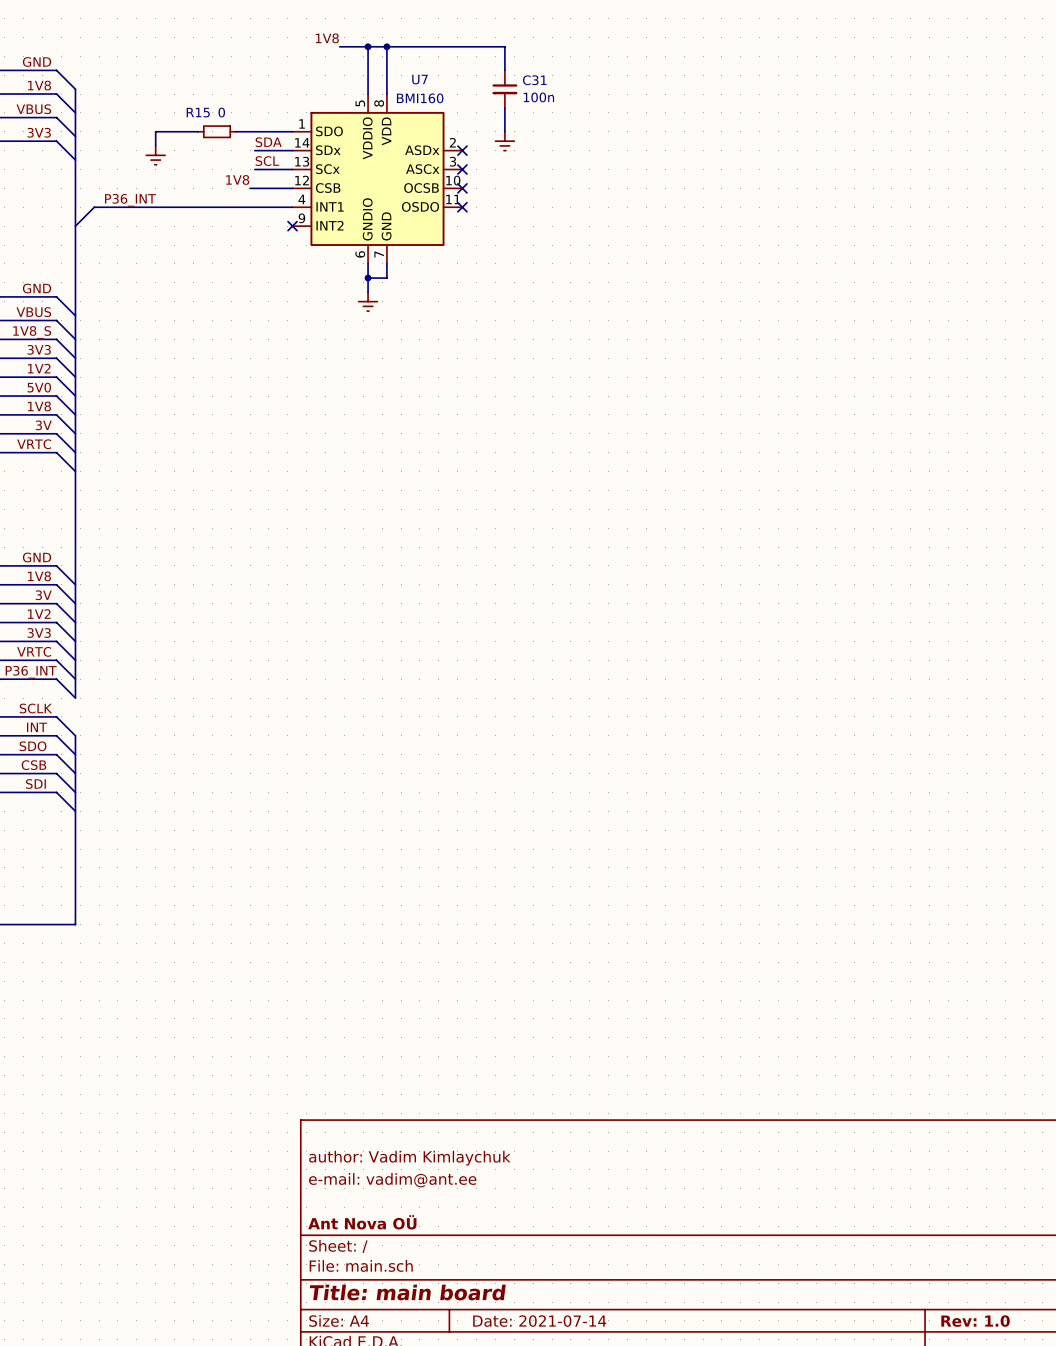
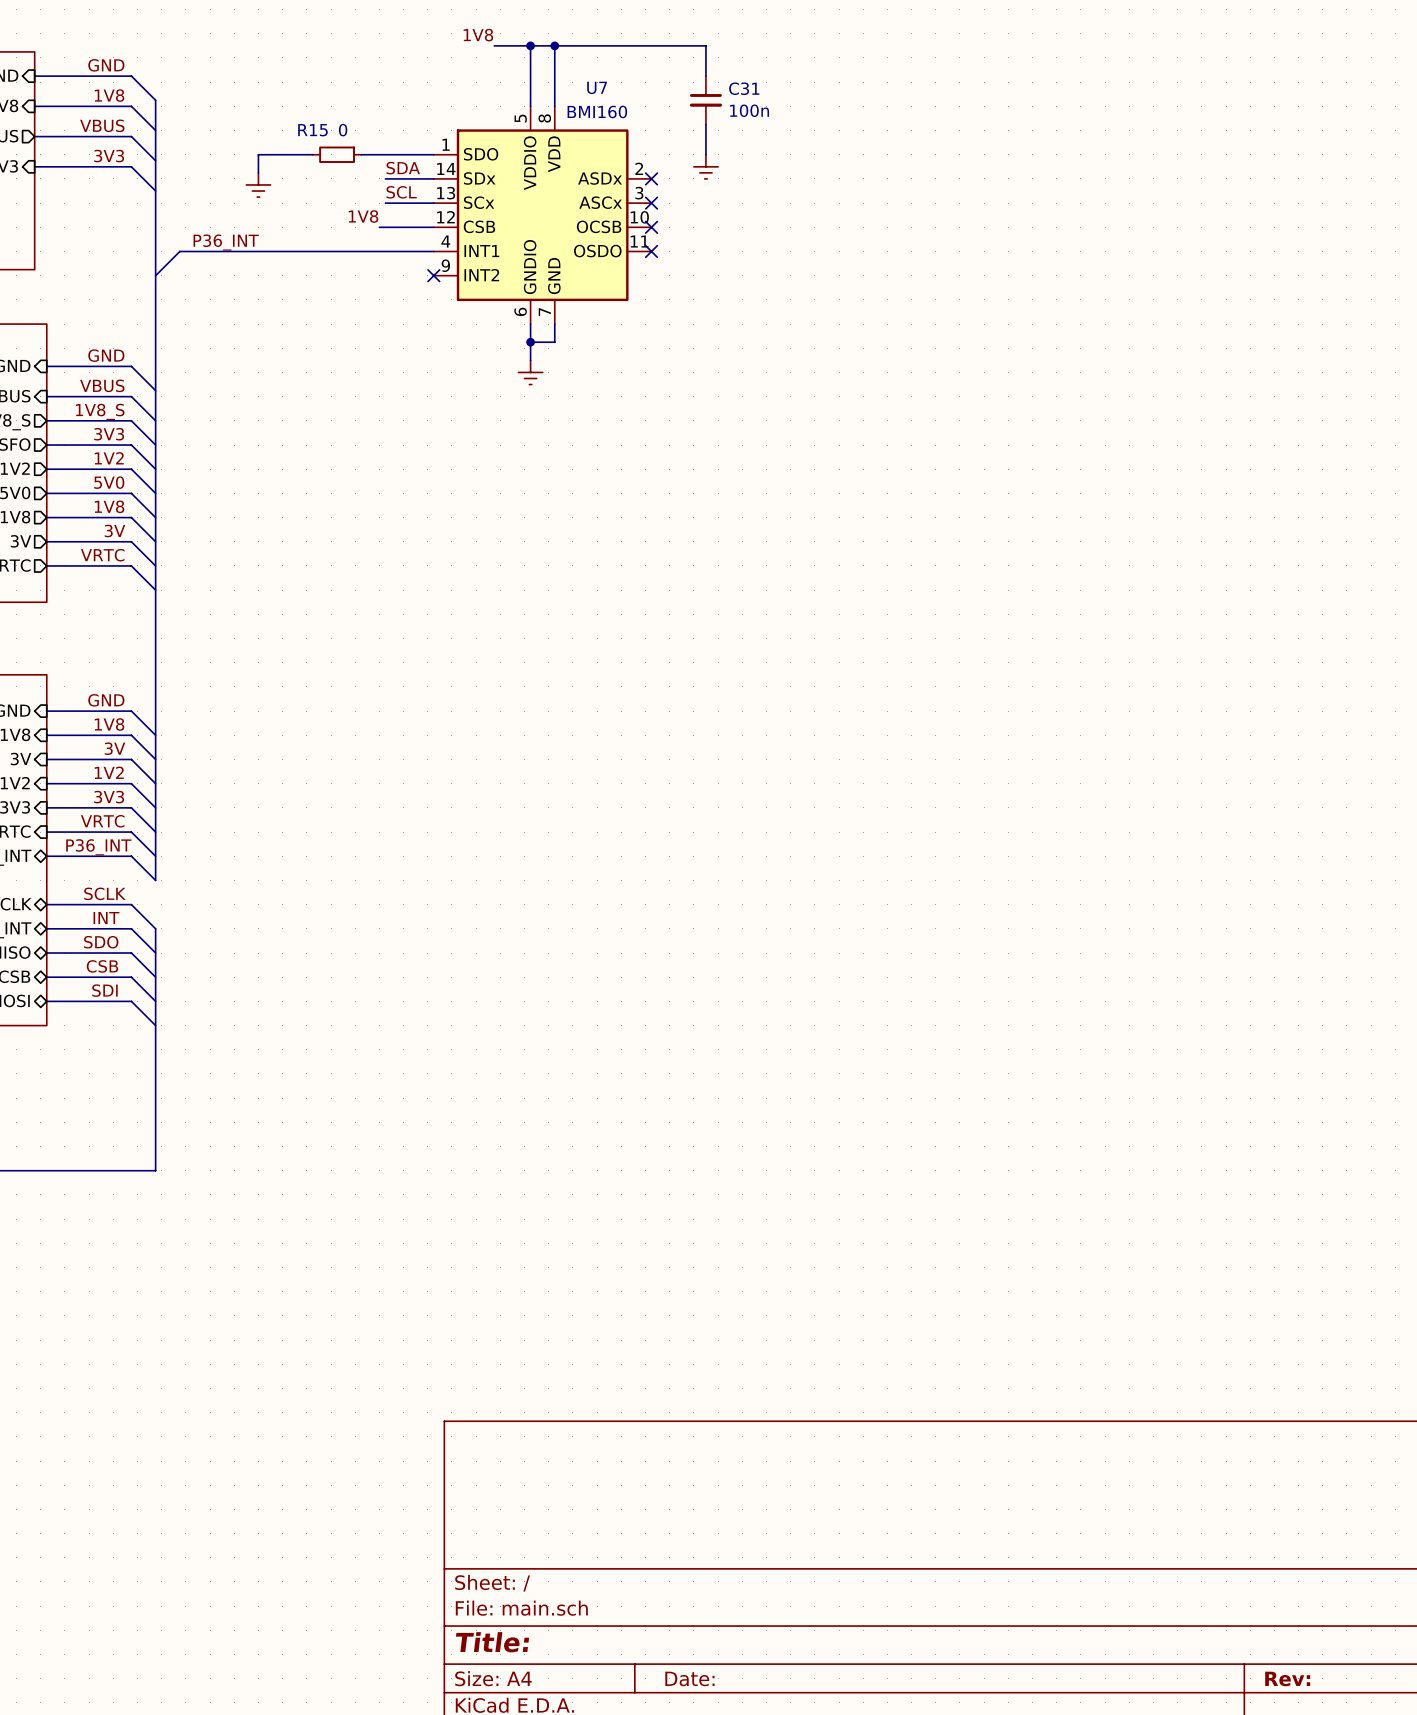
title block: author: Vadim Kimlaychuk (409, 1158) -> none
title block: e-mail: vadim@ant.ee (392, 1180) -> none
title block: Ant Nova OÜ (362, 1222) -> none
title block: Title: main board (407, 1292) -> Title: (492, 1642)
title block: Date: 2021-07-14 (539, 1321) -> Date: (689, 1678)
title block: Rev: 1.0 (975, 1321) -> Rev: (1287, 1678)

